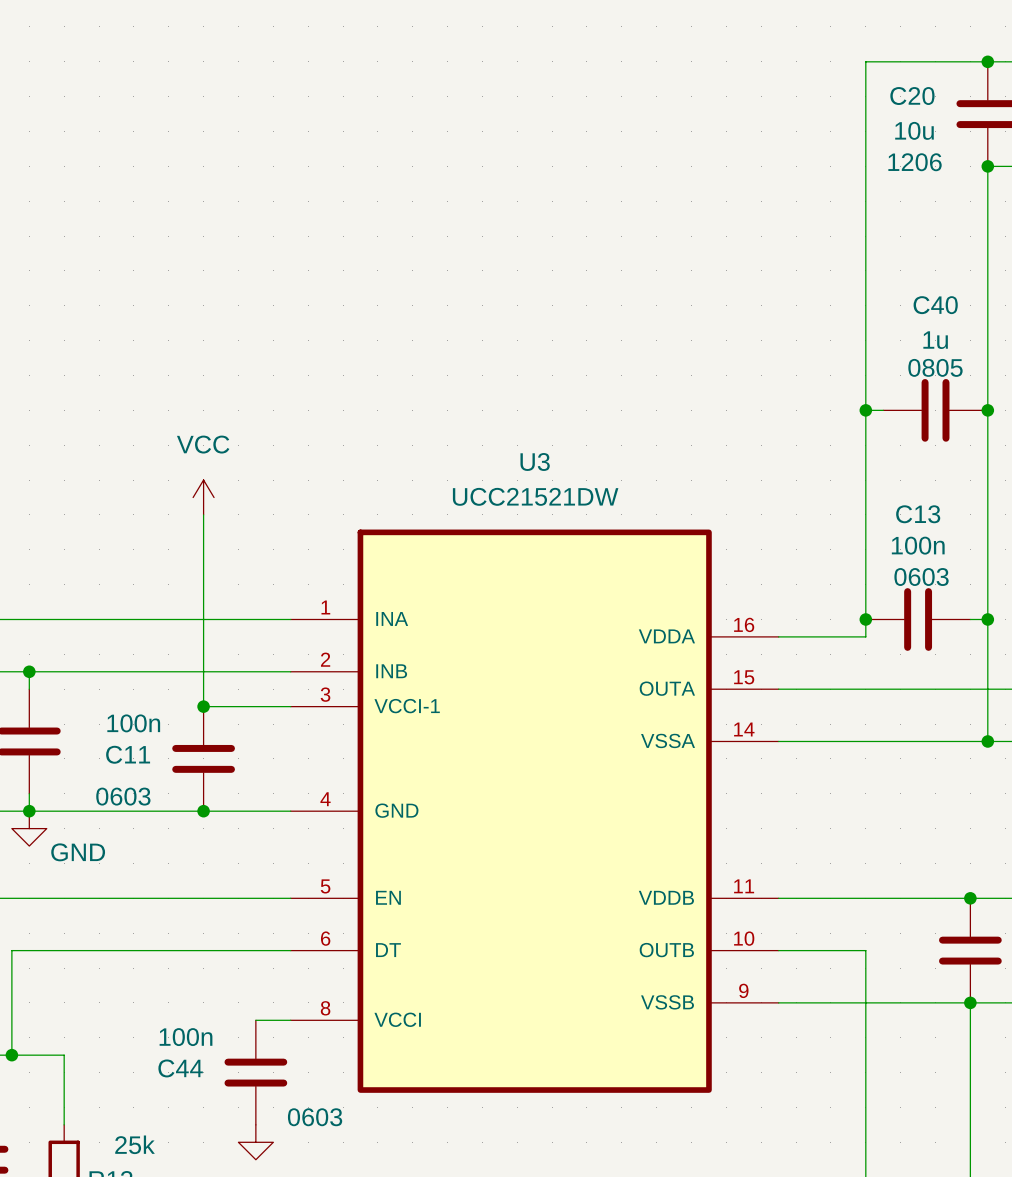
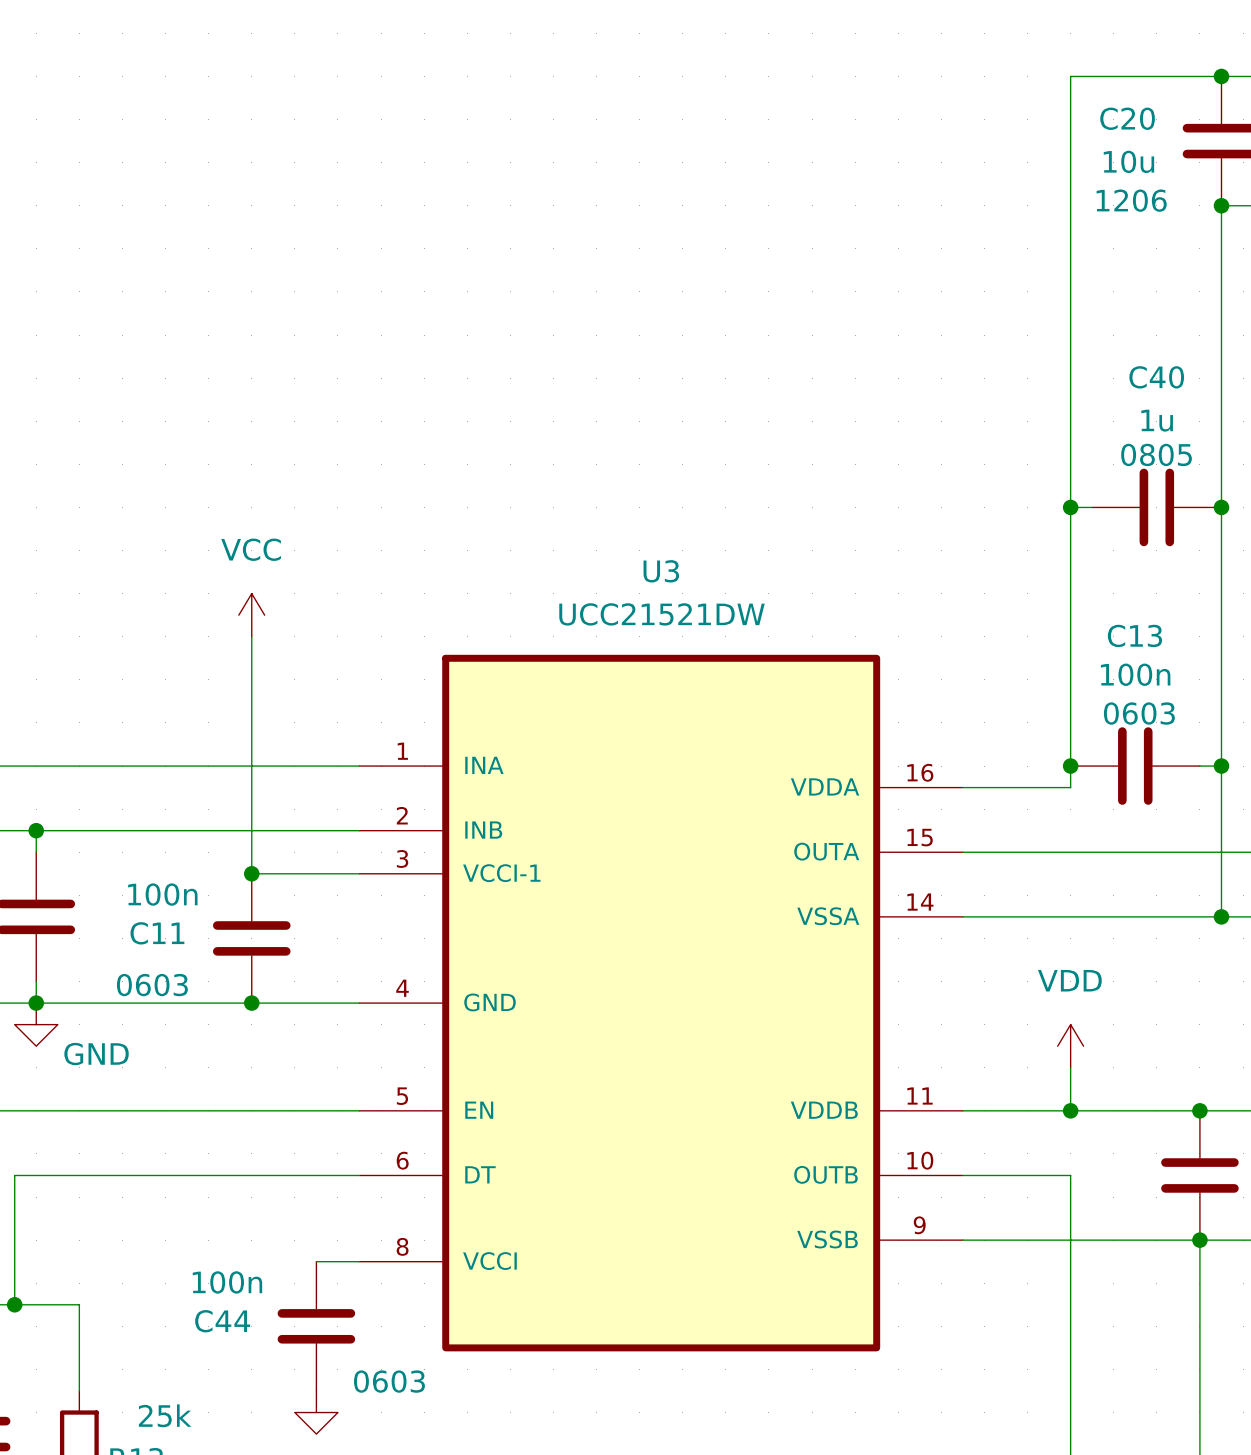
power symbol: none -> VDD (1070, 1046)
wire: none -> (1070, 1067) (1070, 1110)
junction: none -> (1070, 1110)

